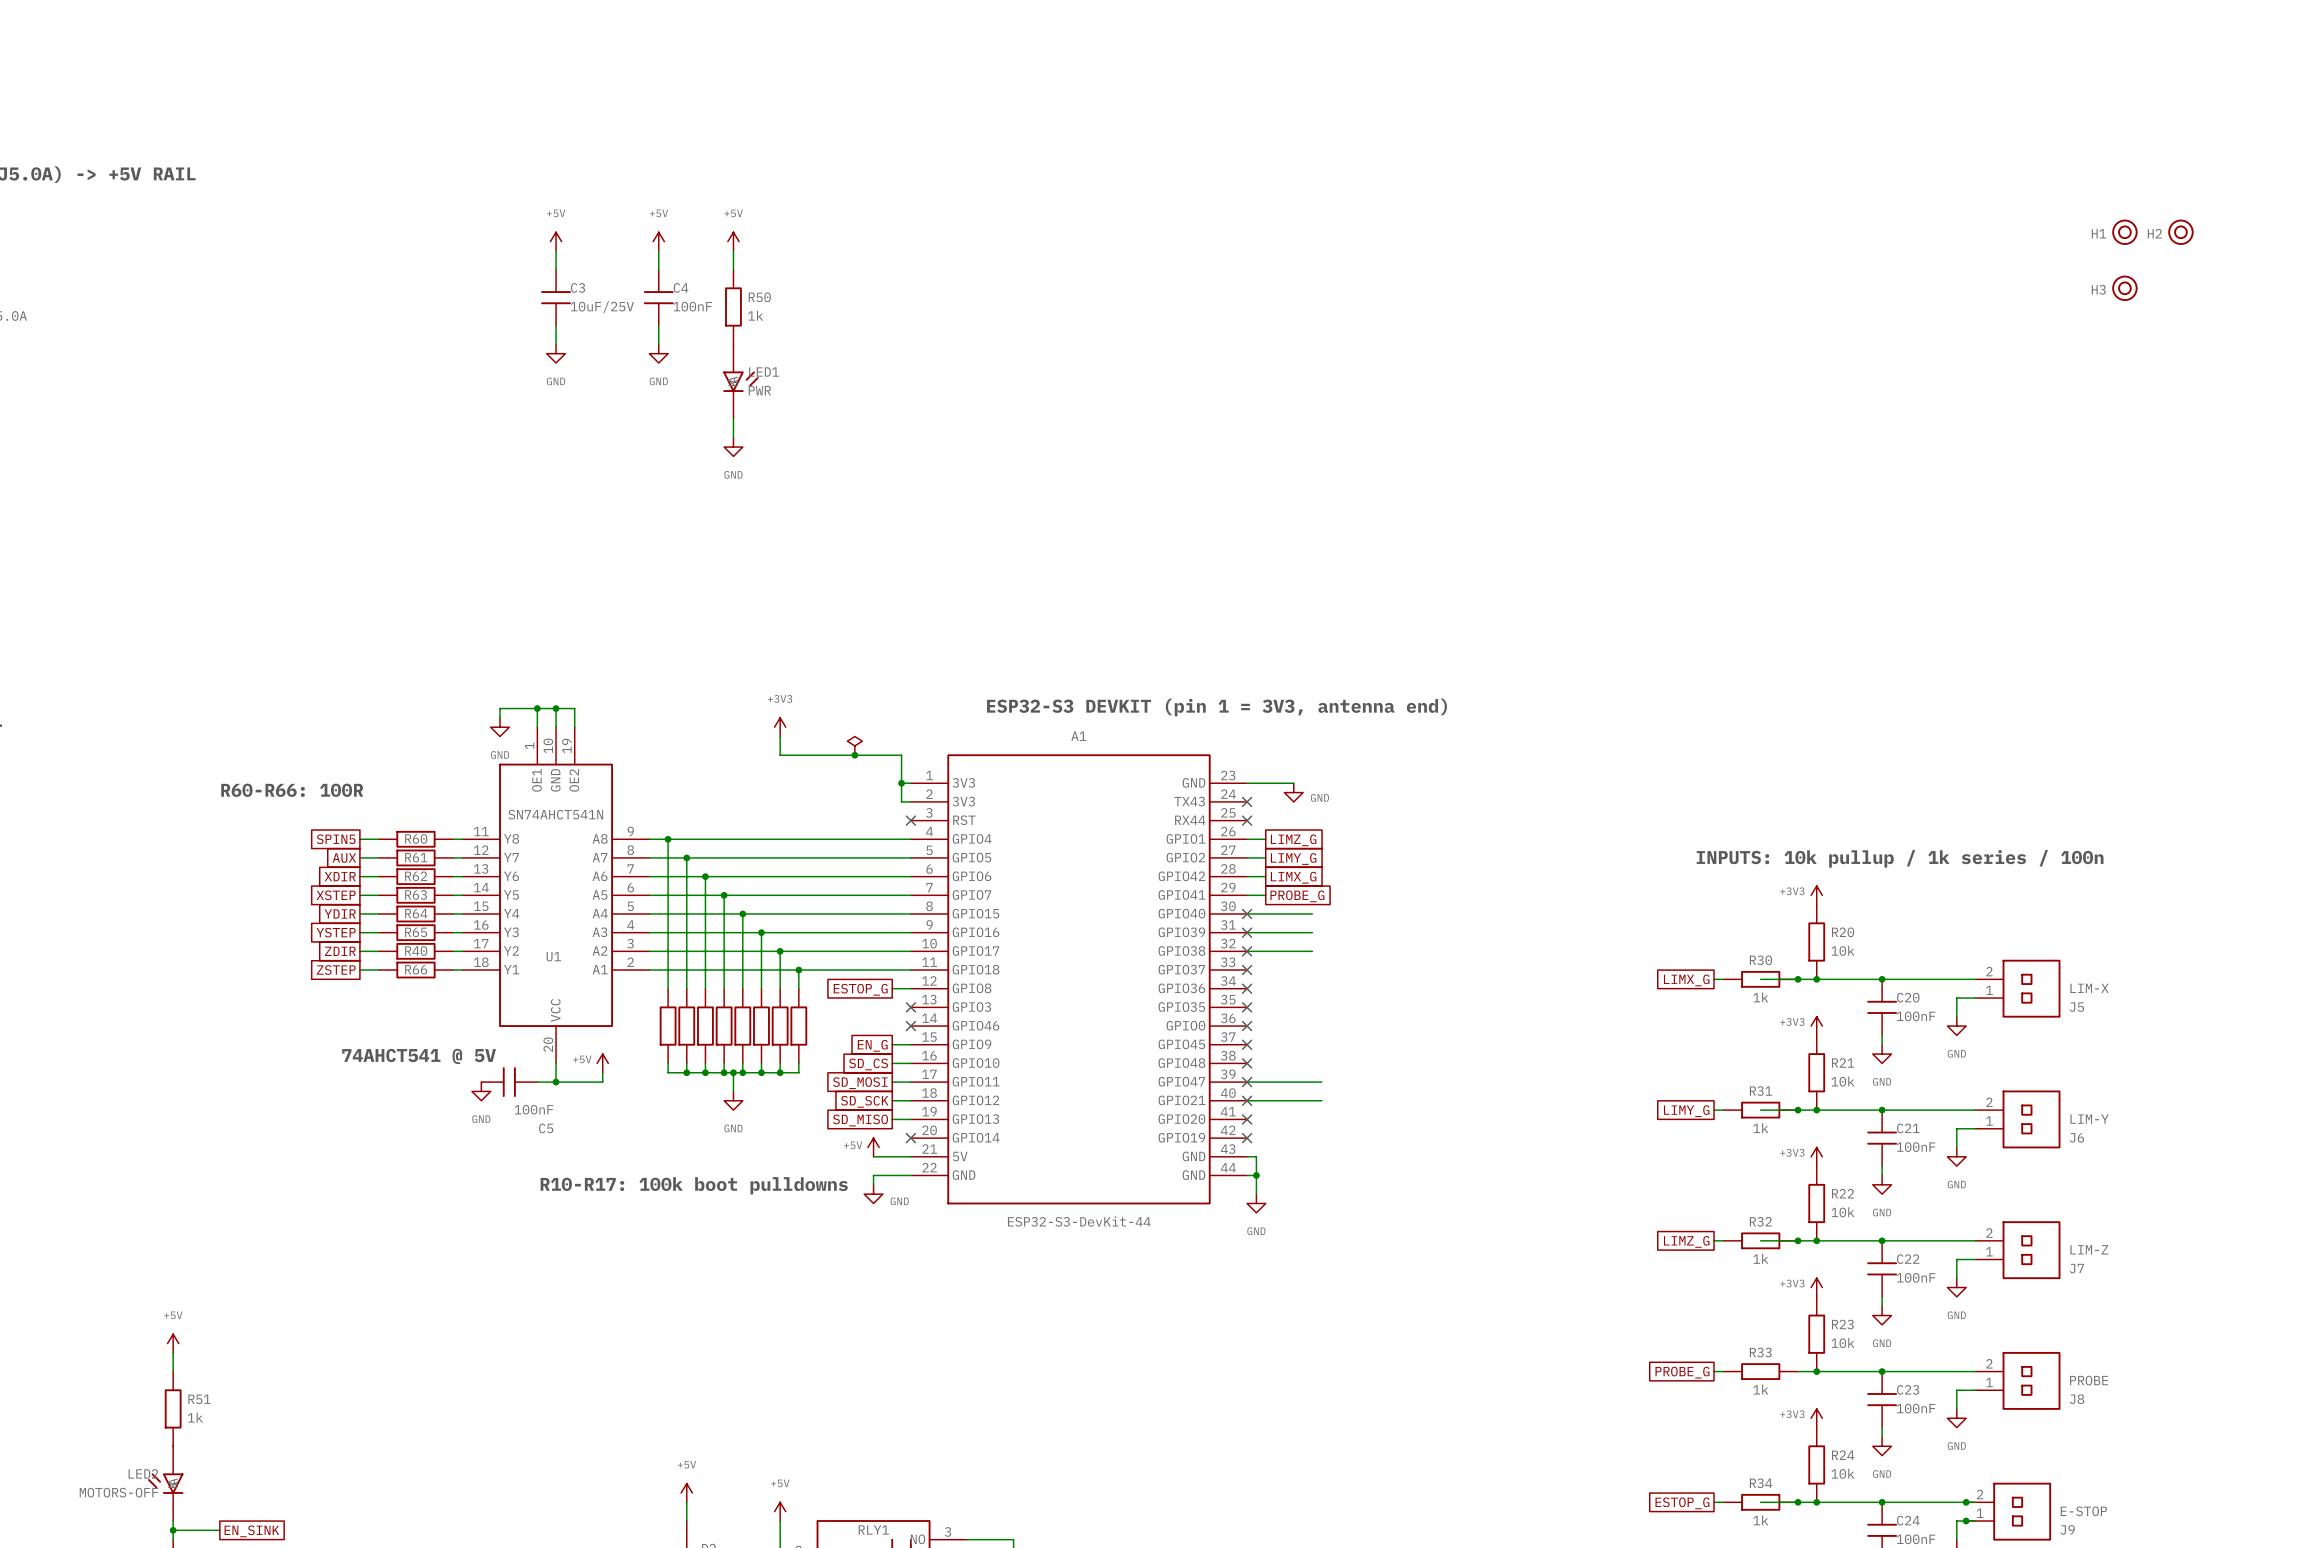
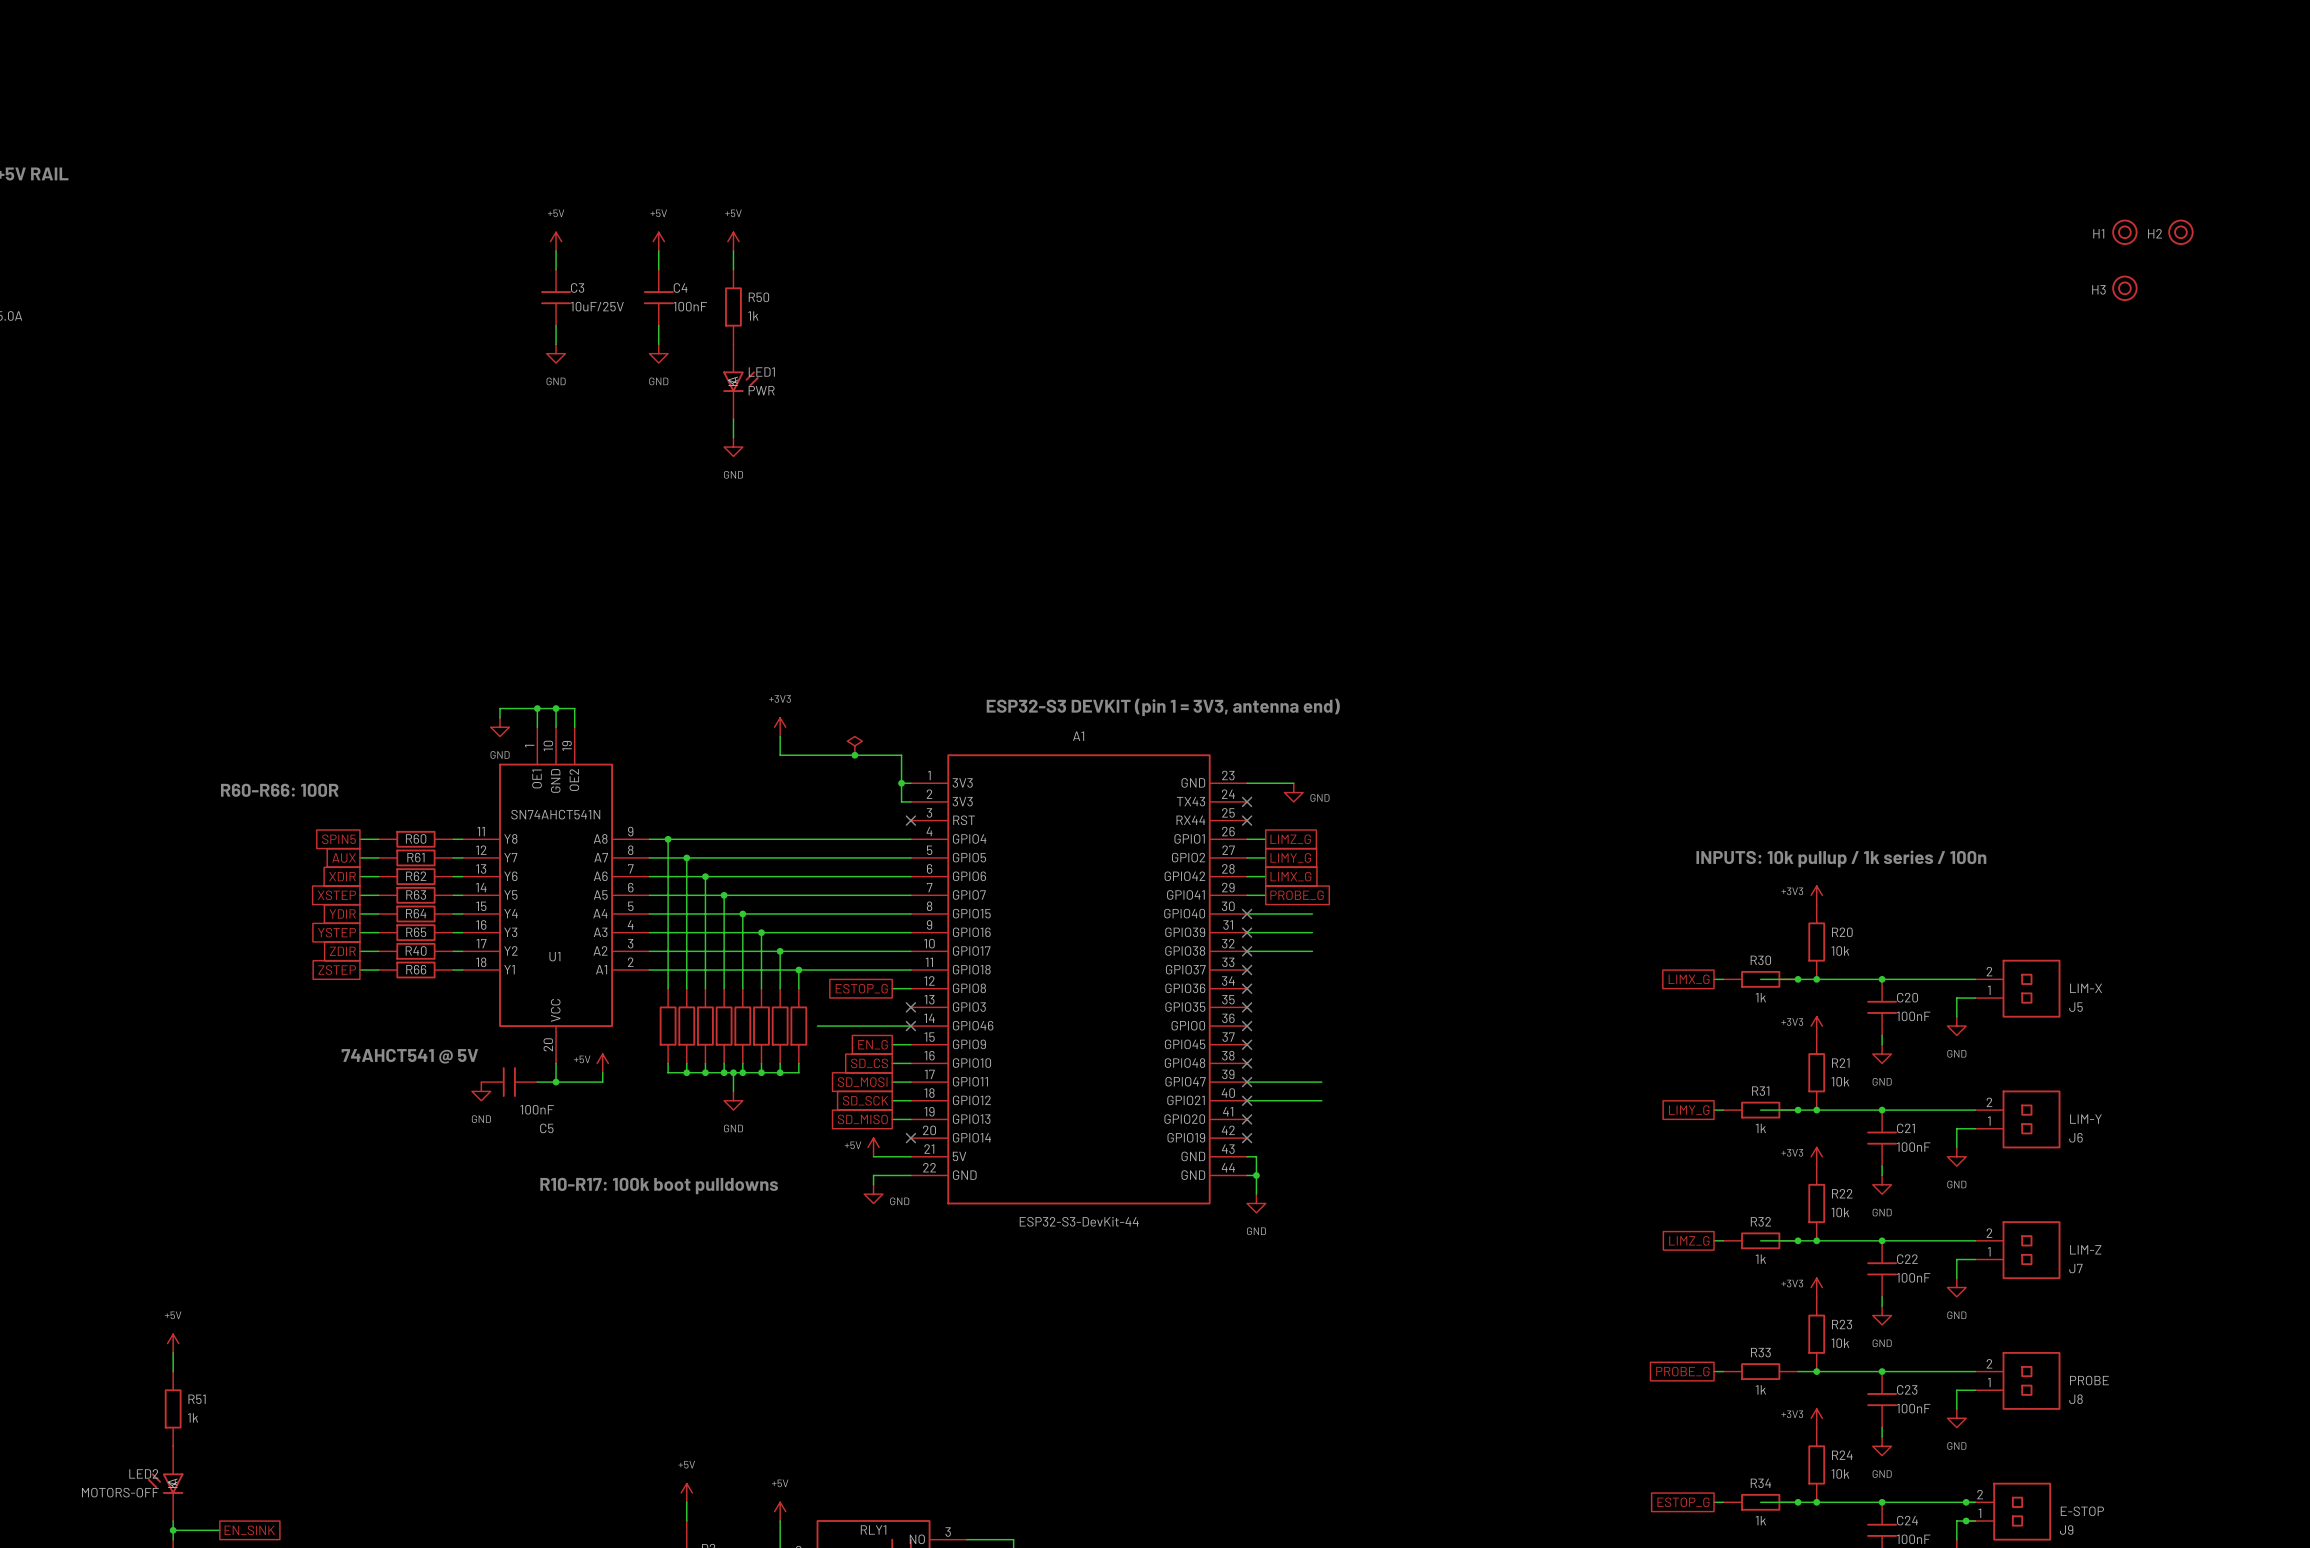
wire: none -> (817, 1026) (910, 1026)

